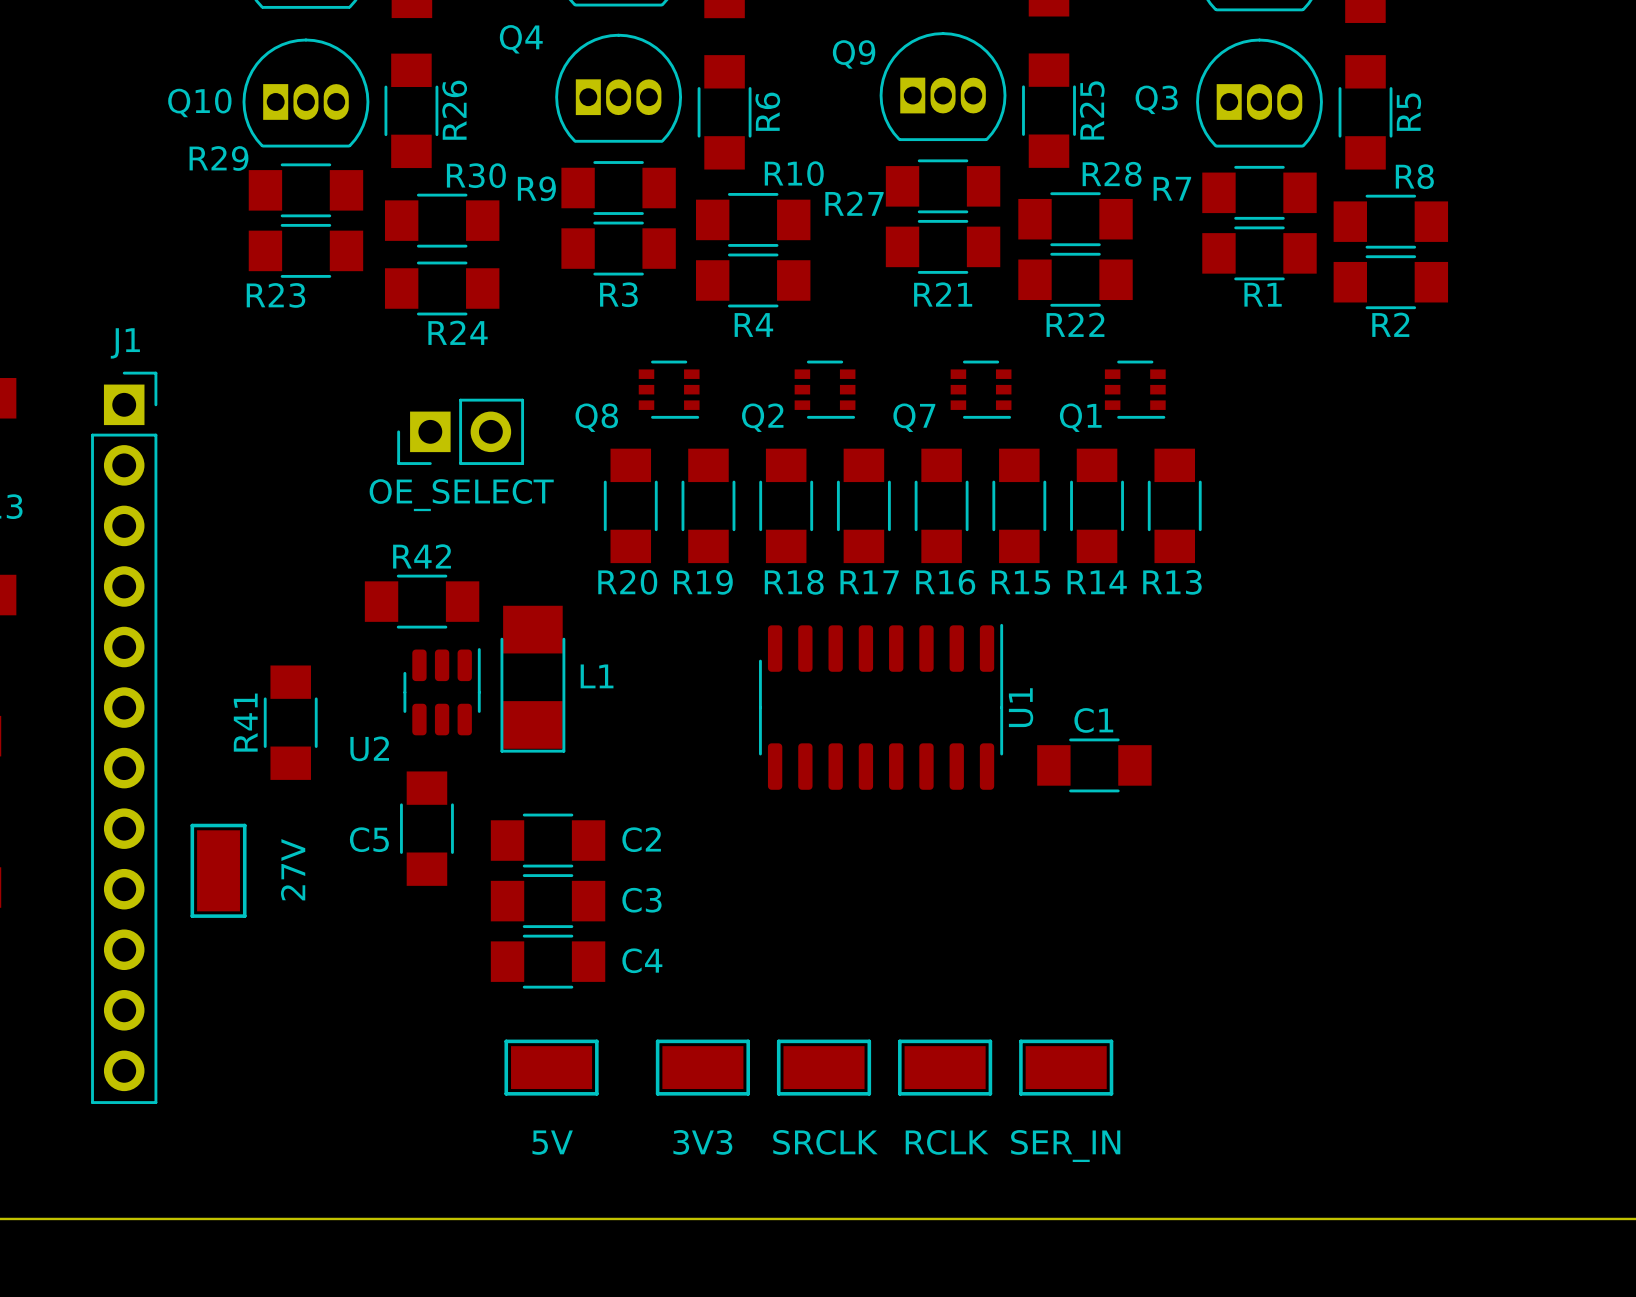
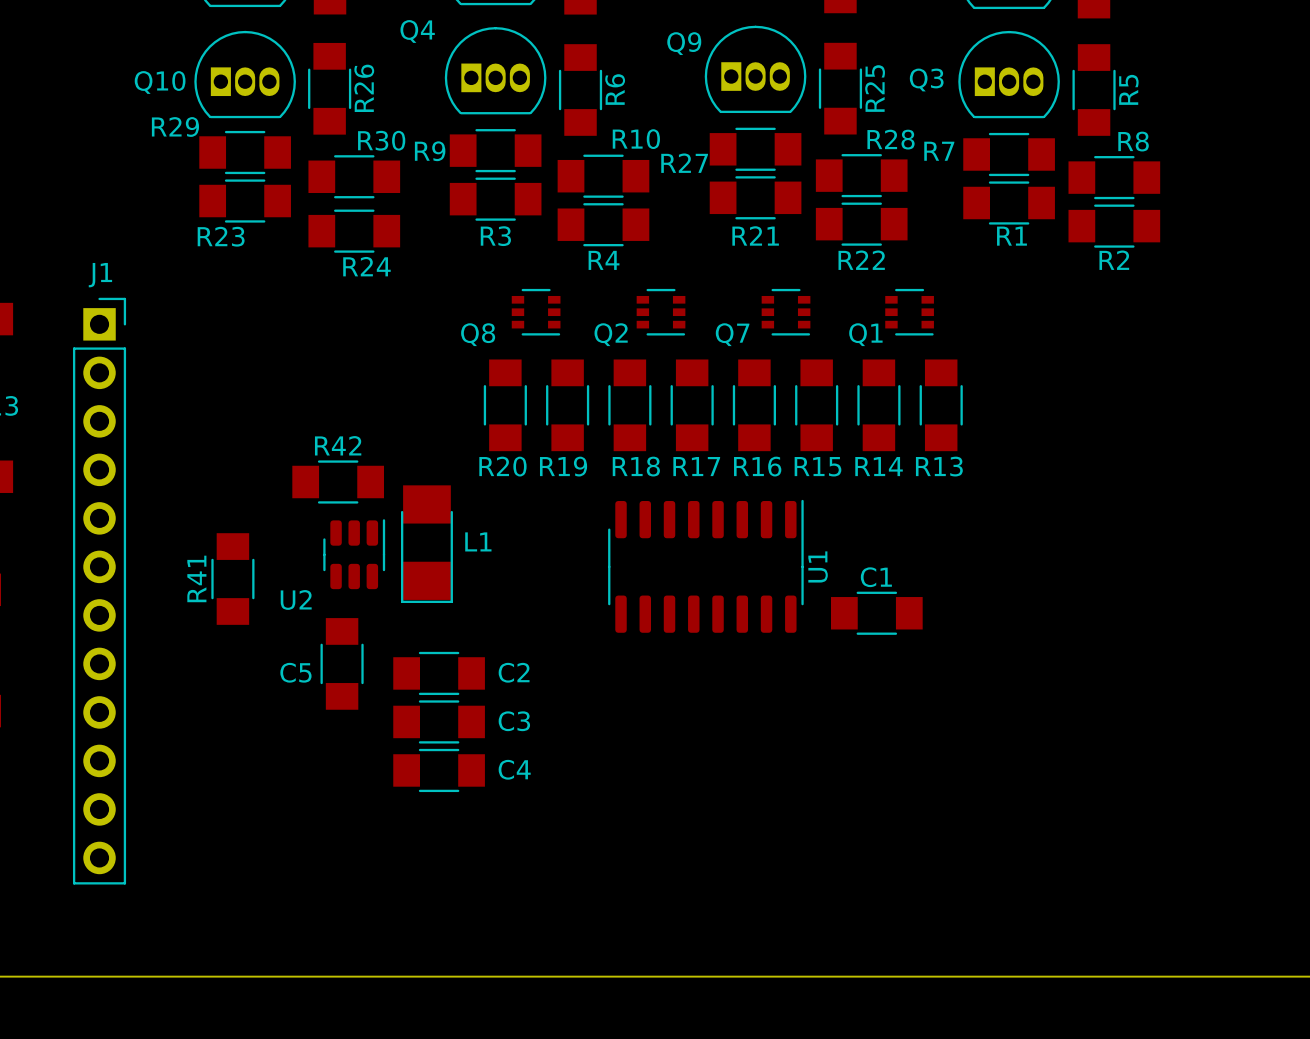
OE_SELECT: (460, 431) -> none
27V: (218, 870) -> none
5V: (551, 1067) -> none
3V3: (702, 1067) -> none
SRCLK: (824, 1067) -> none
RCLK: (945, 1067) -> none
SER_IN: (1066, 1067) -> none

